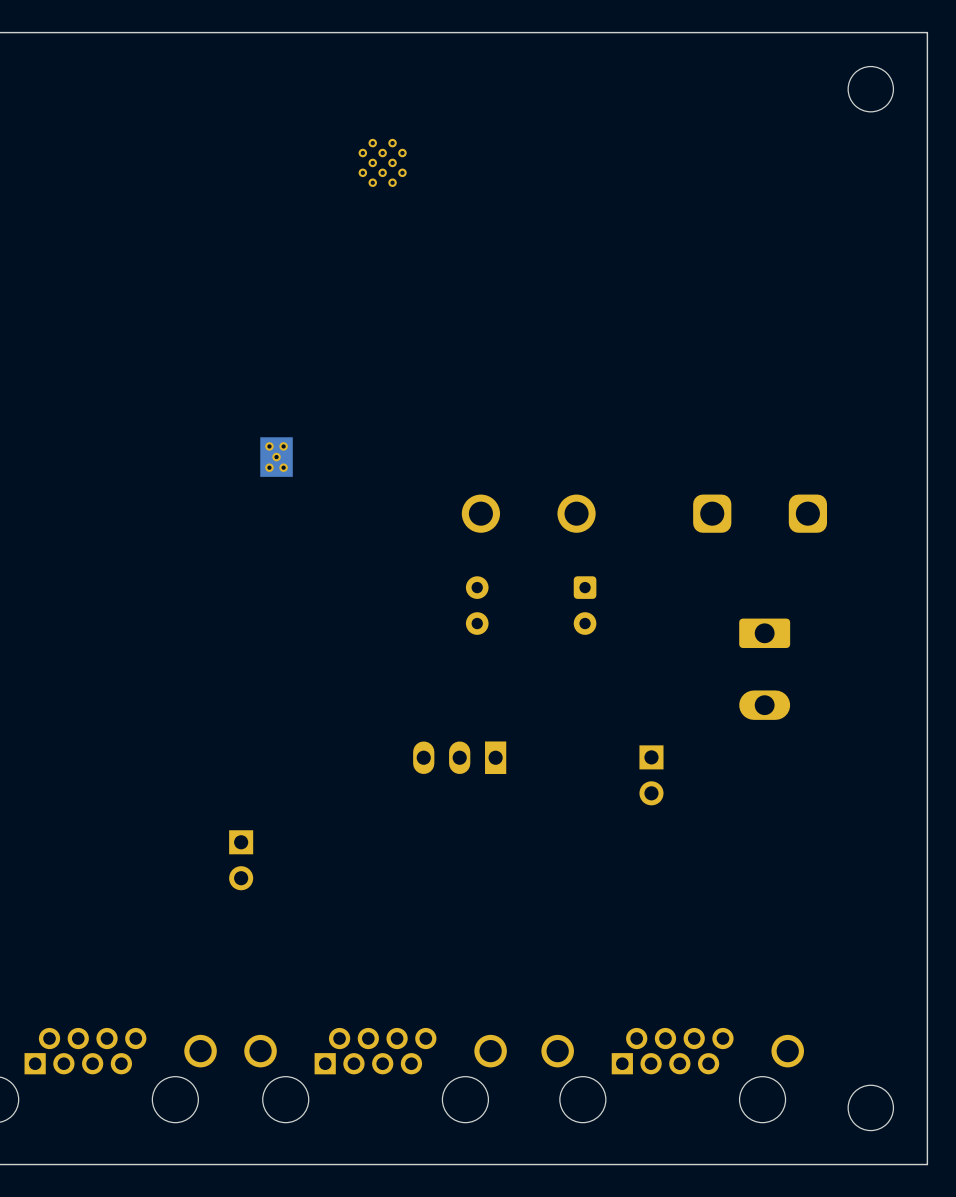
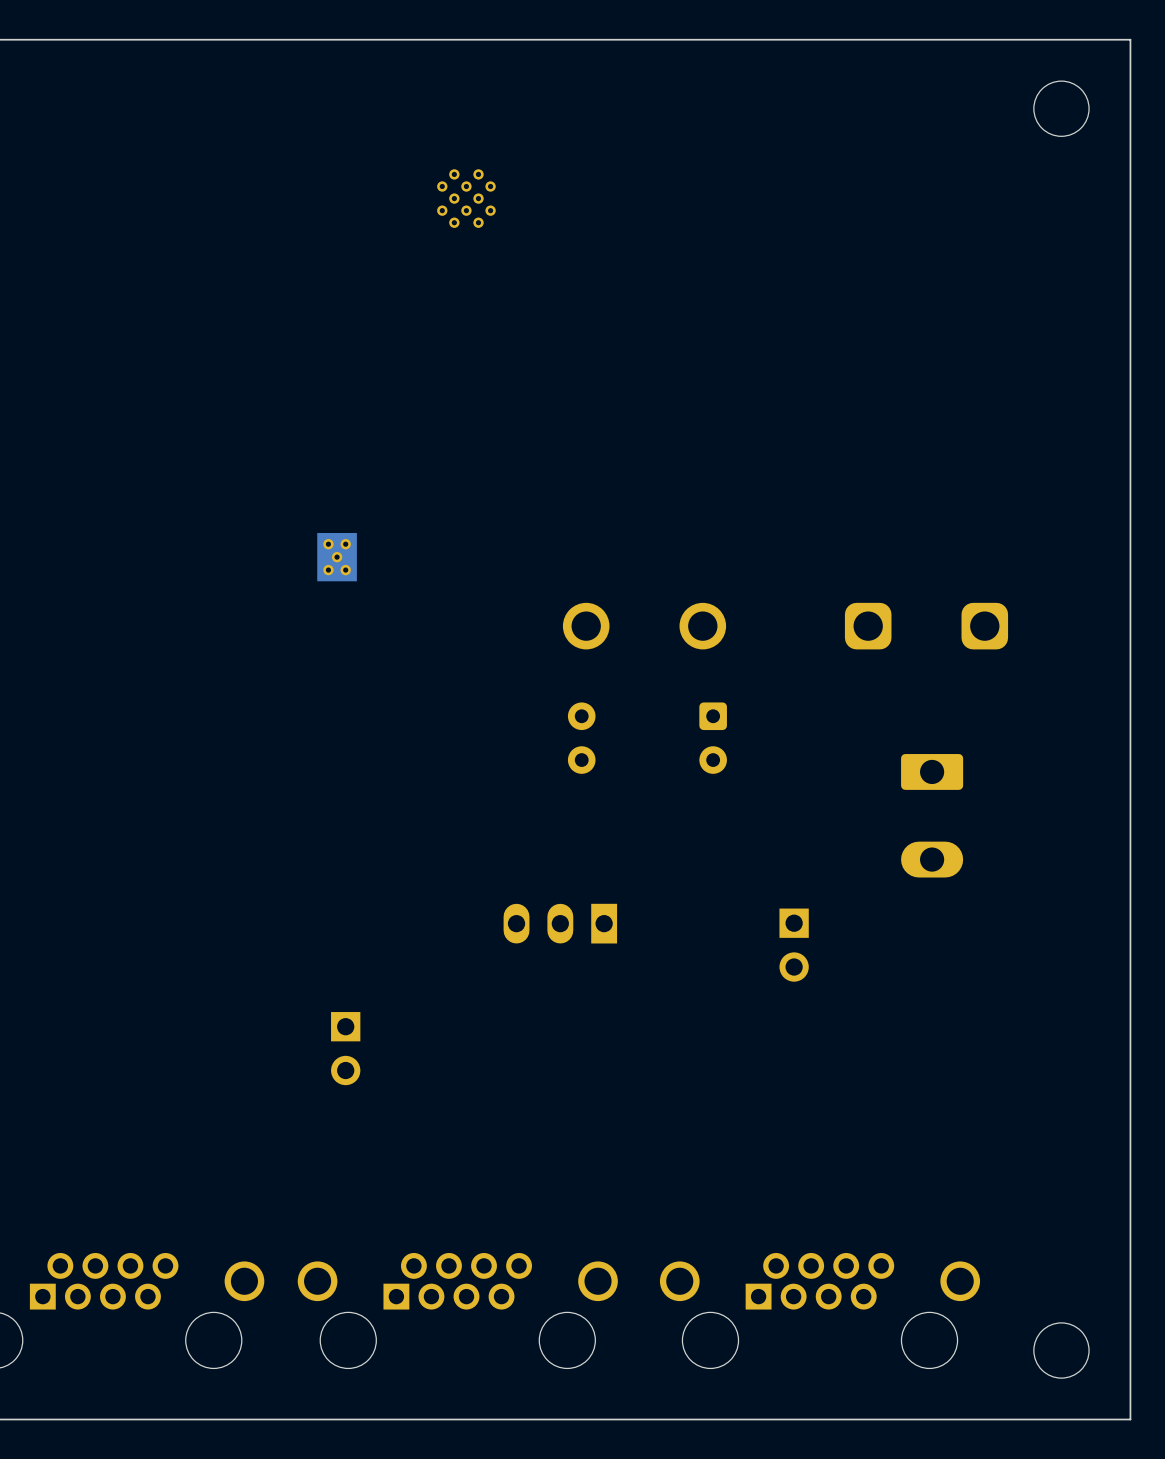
part position: (241, 860) -> (345, 1048)

